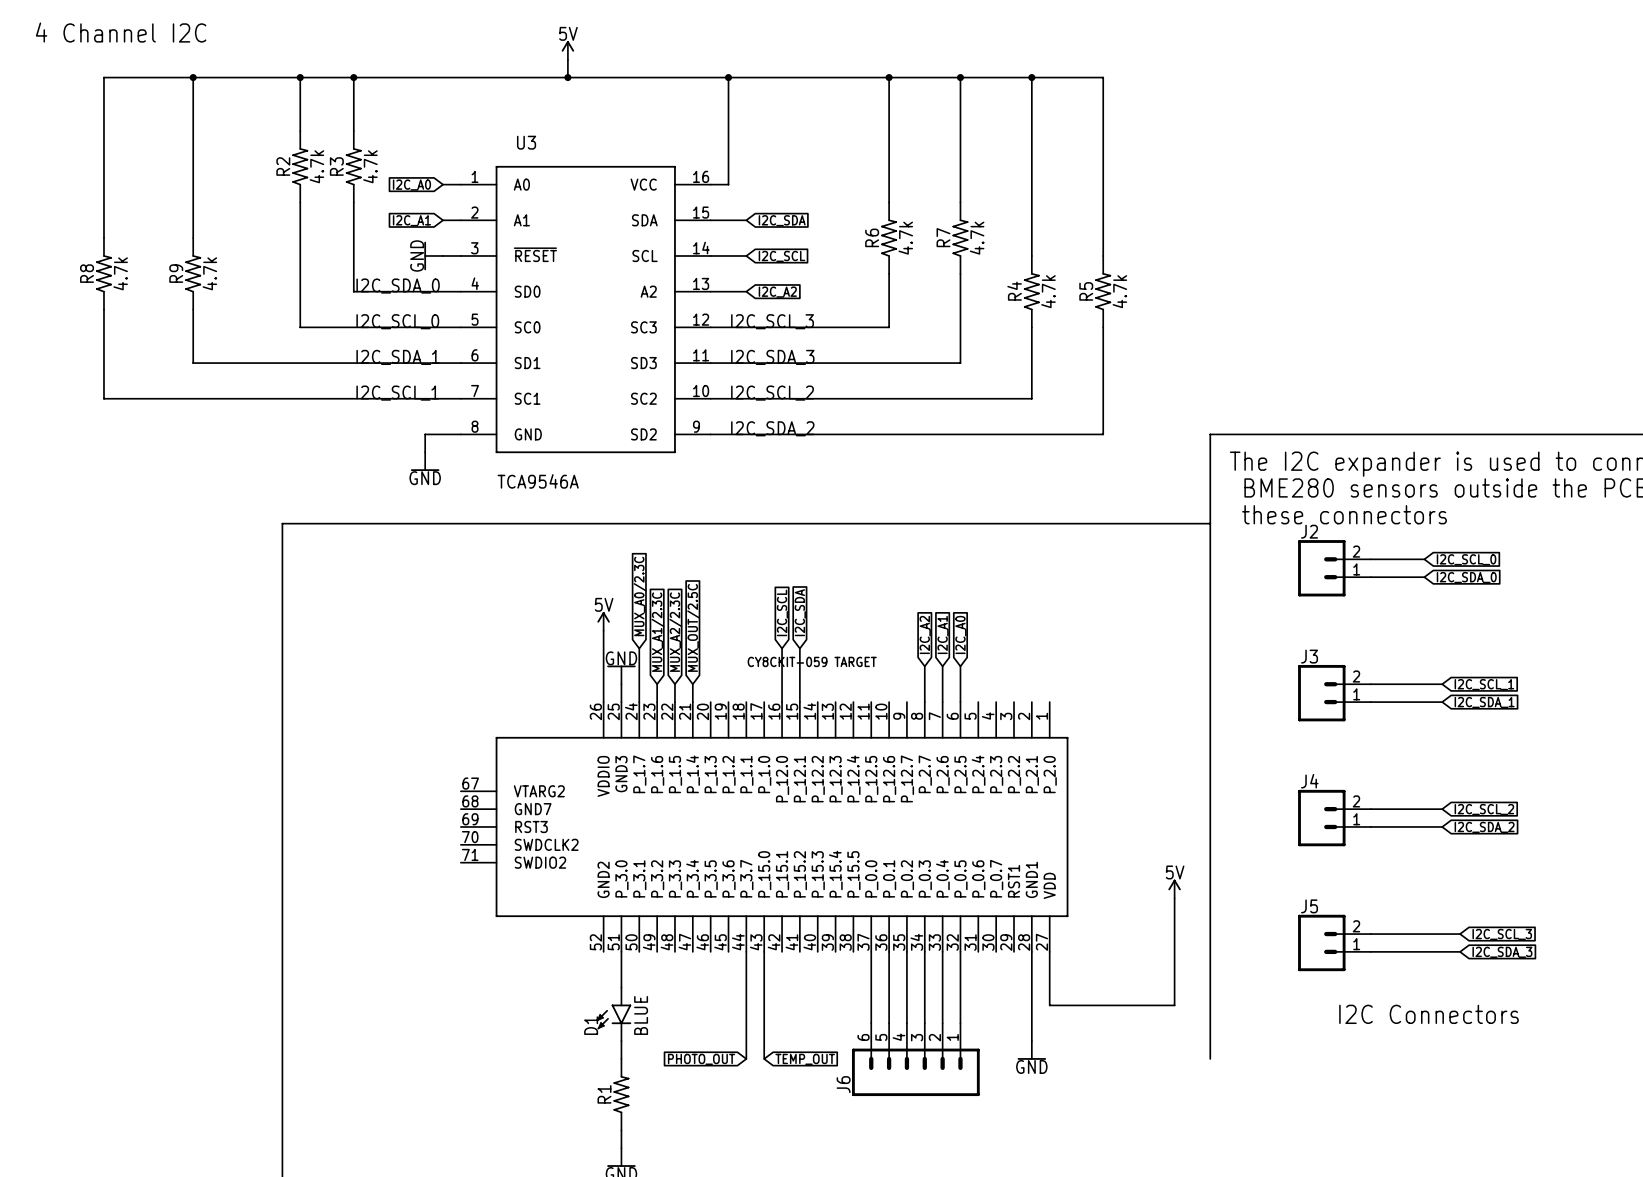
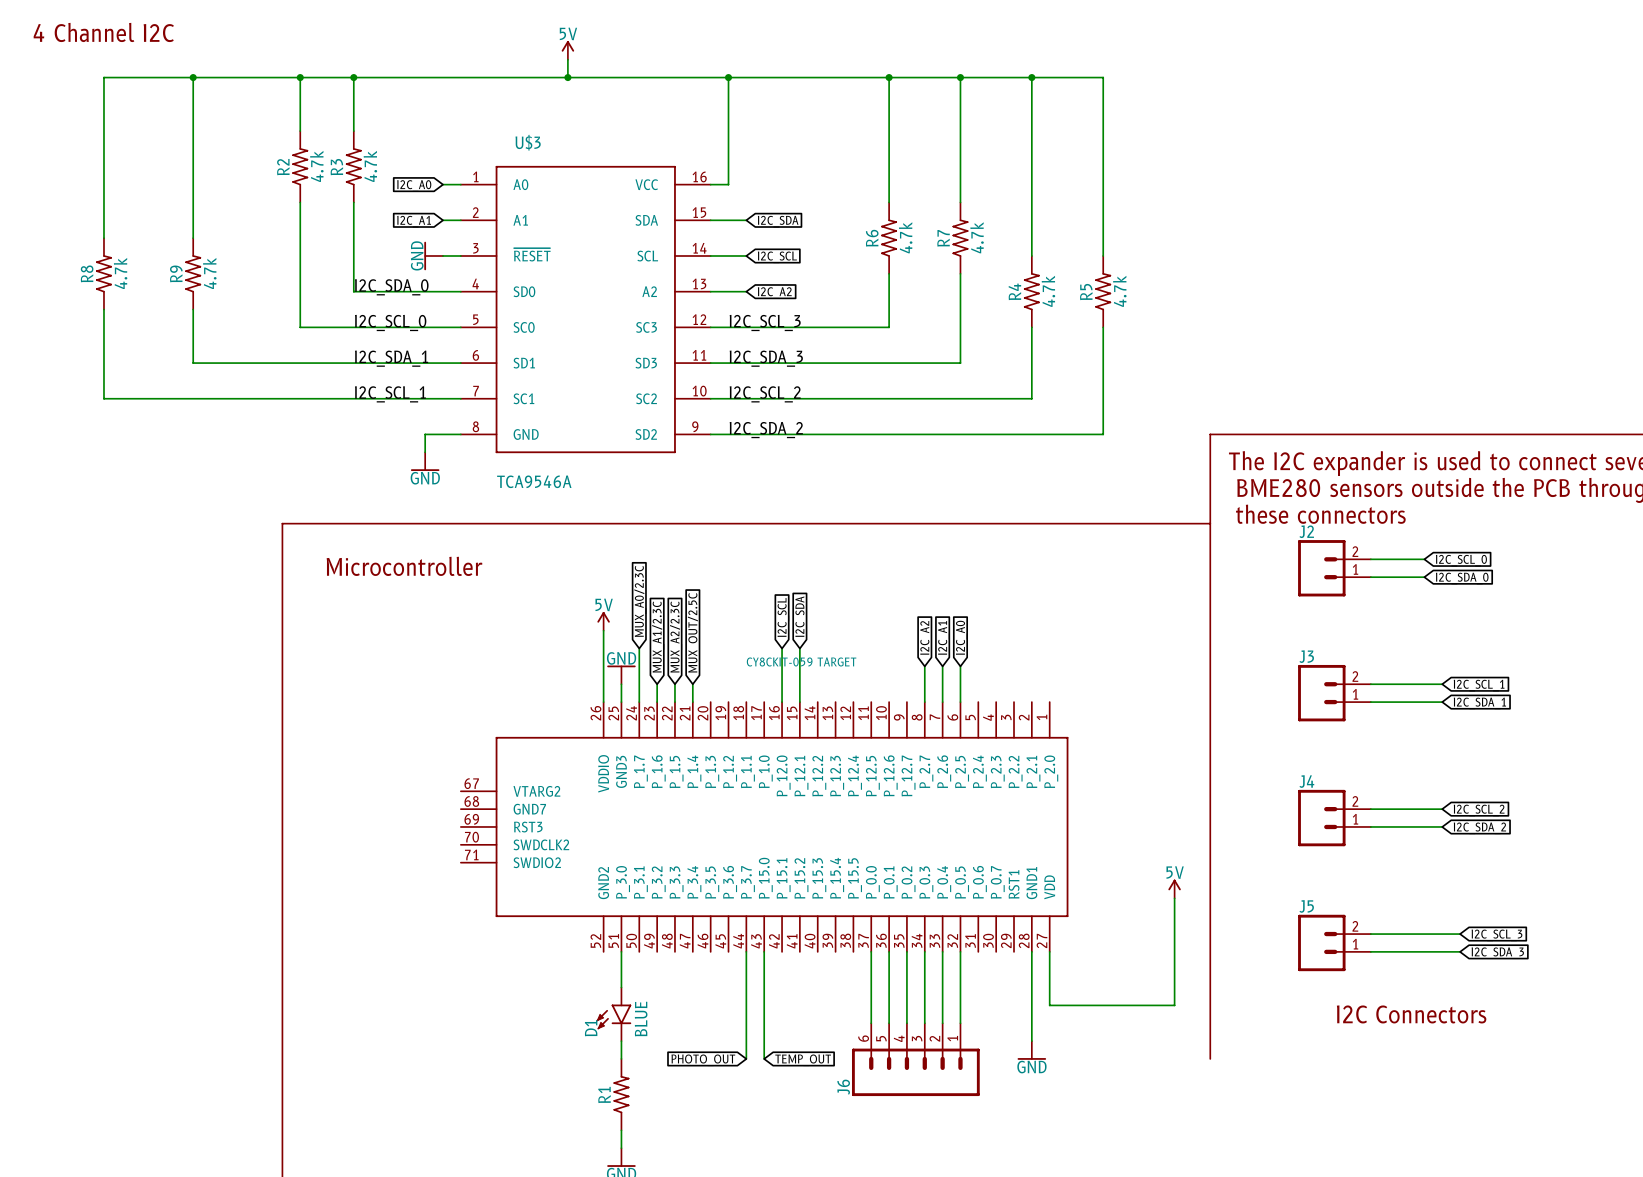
U3 name: U3 (526, 142) -> U$3 (528, 142)
text: none -> Microcontroller (404, 566)

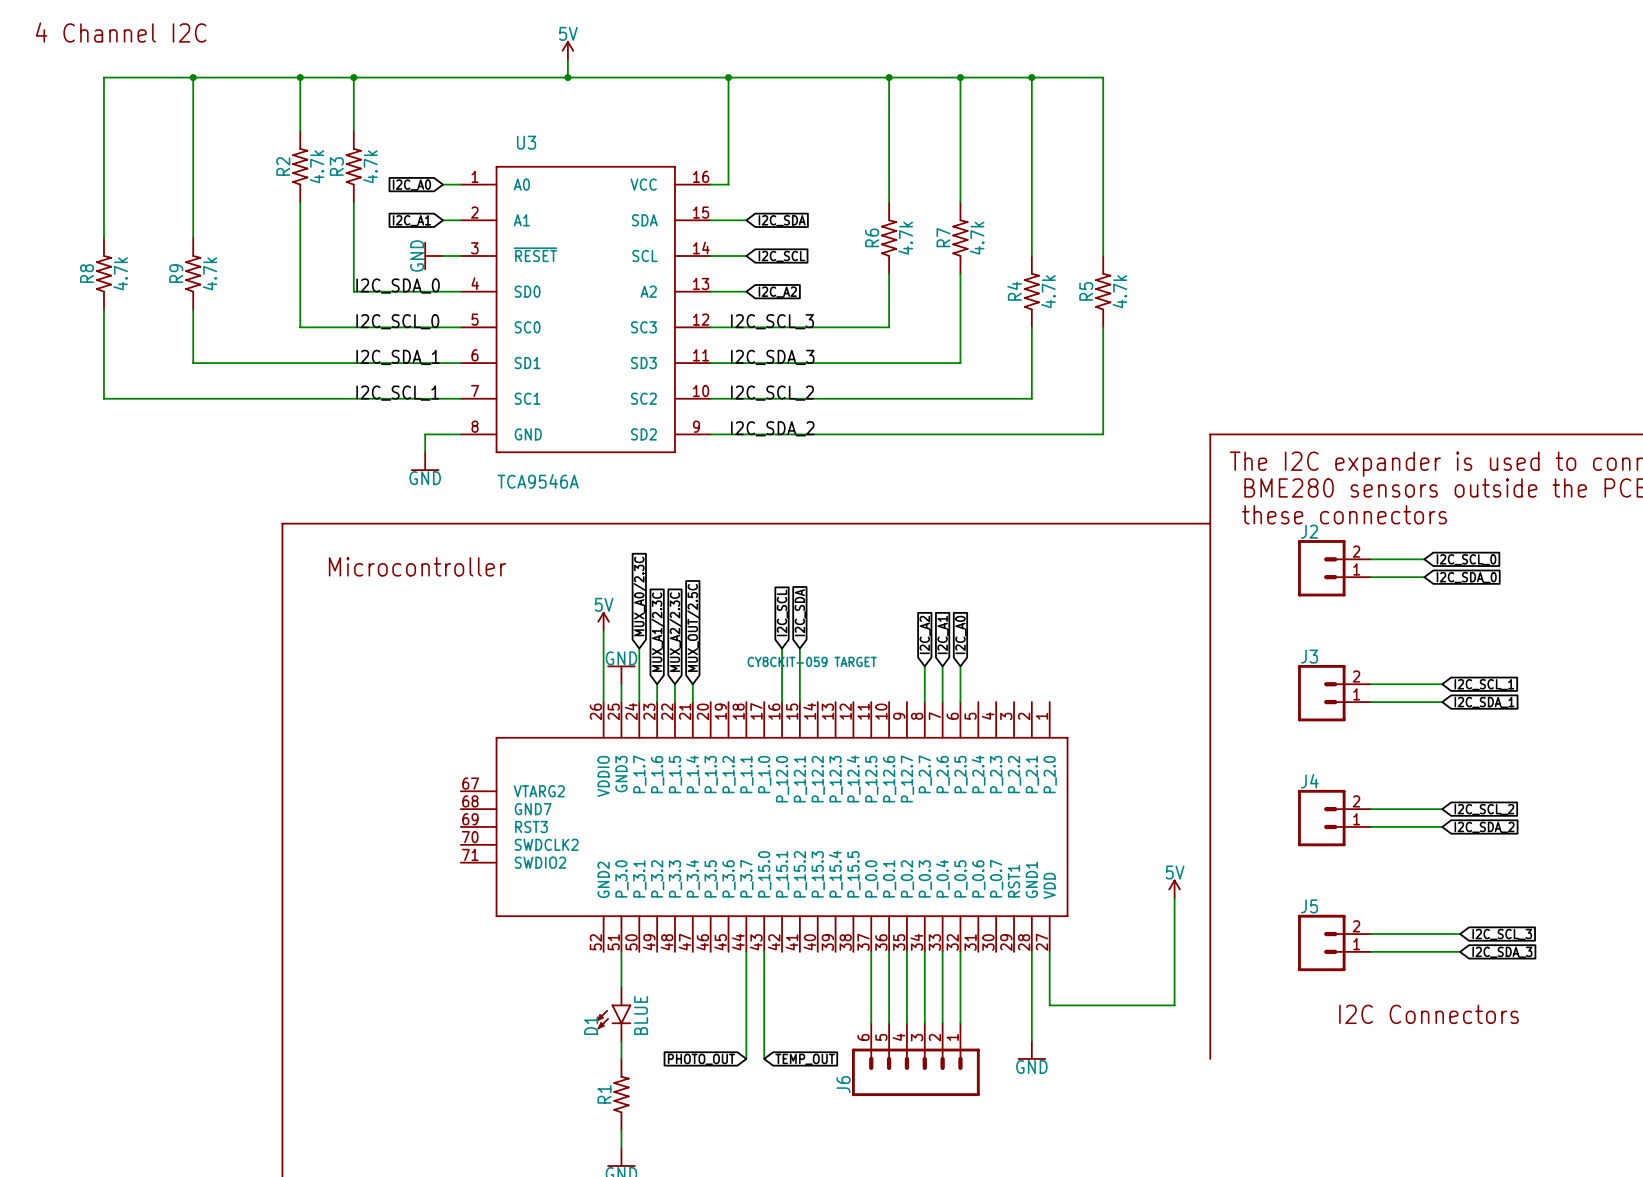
U$3 name: U$3 (528, 142) -> U3 (526, 142)

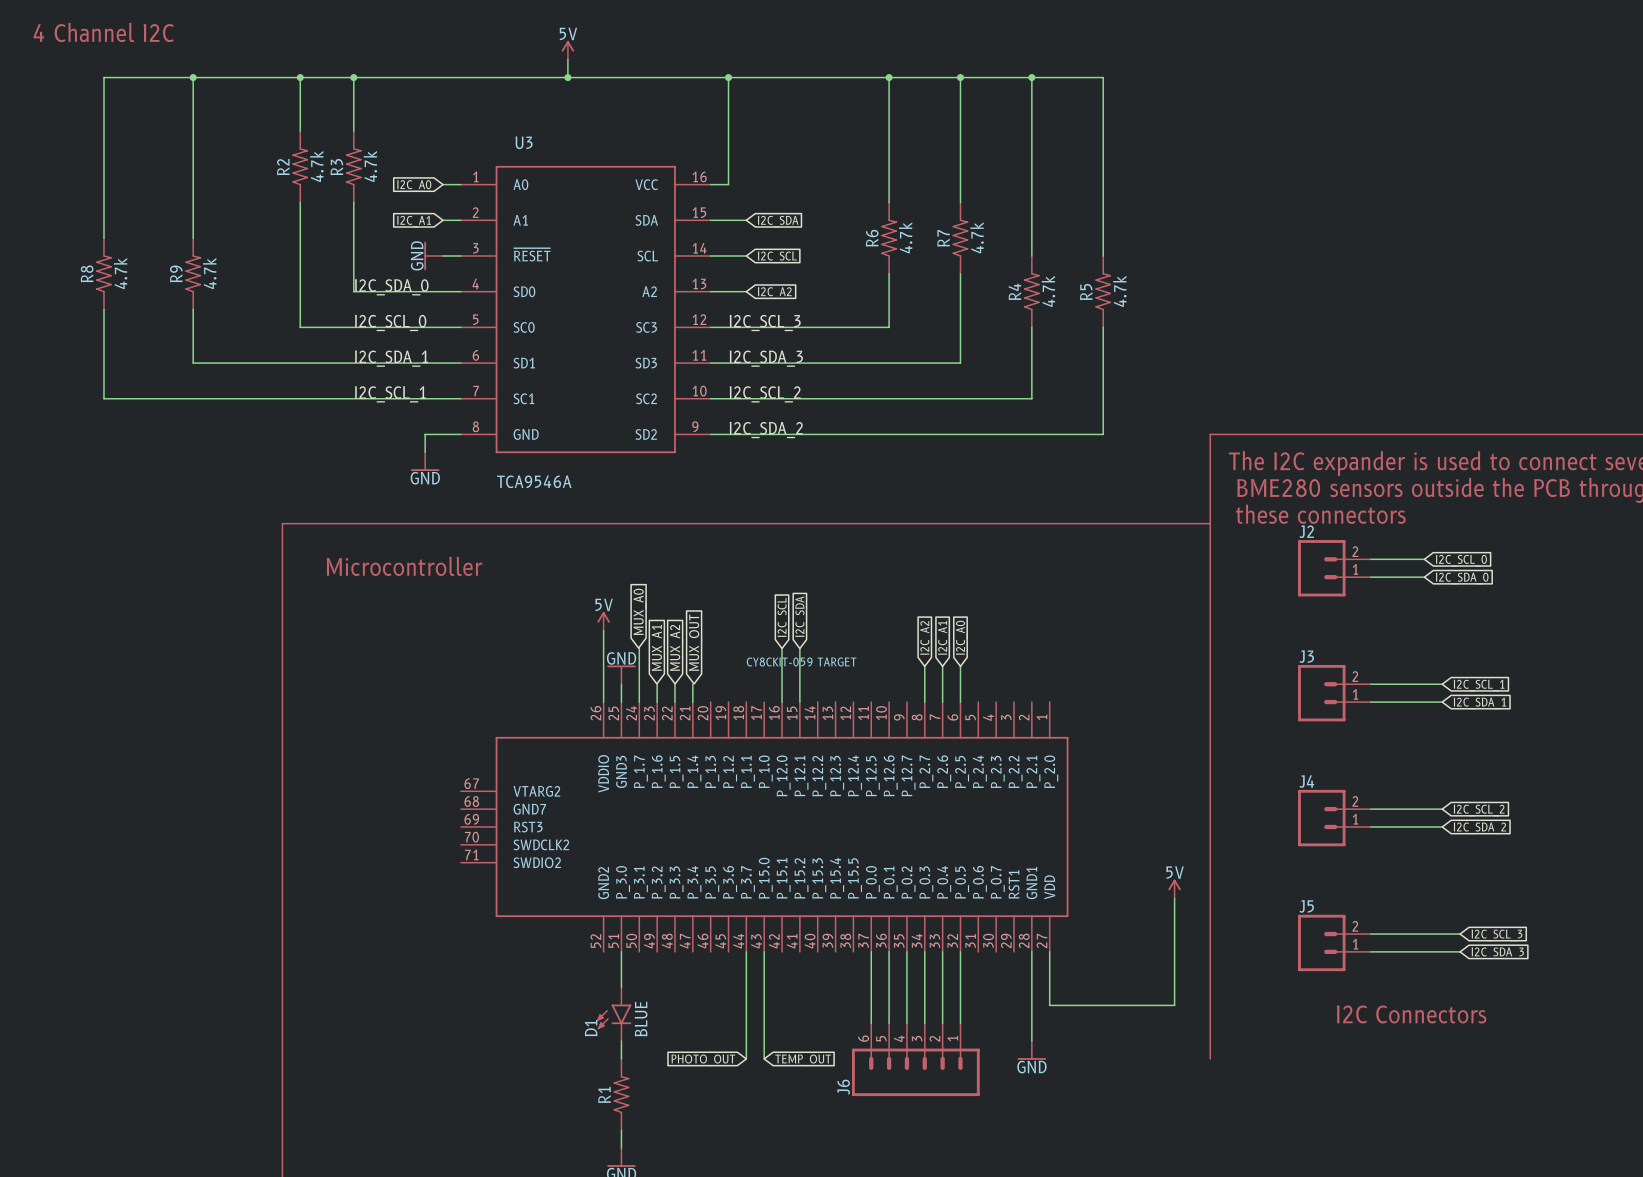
global label: MUX_A0/2.3C (640, 596) -> MUX_A0 (640, 611)
global label: MUX_OUT/2.5C (693, 627) -> MUX_OUT (695, 642)
global label: MUX_A1/2.3C (657, 632) -> MUX_A1 (658, 647)
global label: MUX_A2/2.3C (675, 632) -> MUX_A2 (676, 647)

